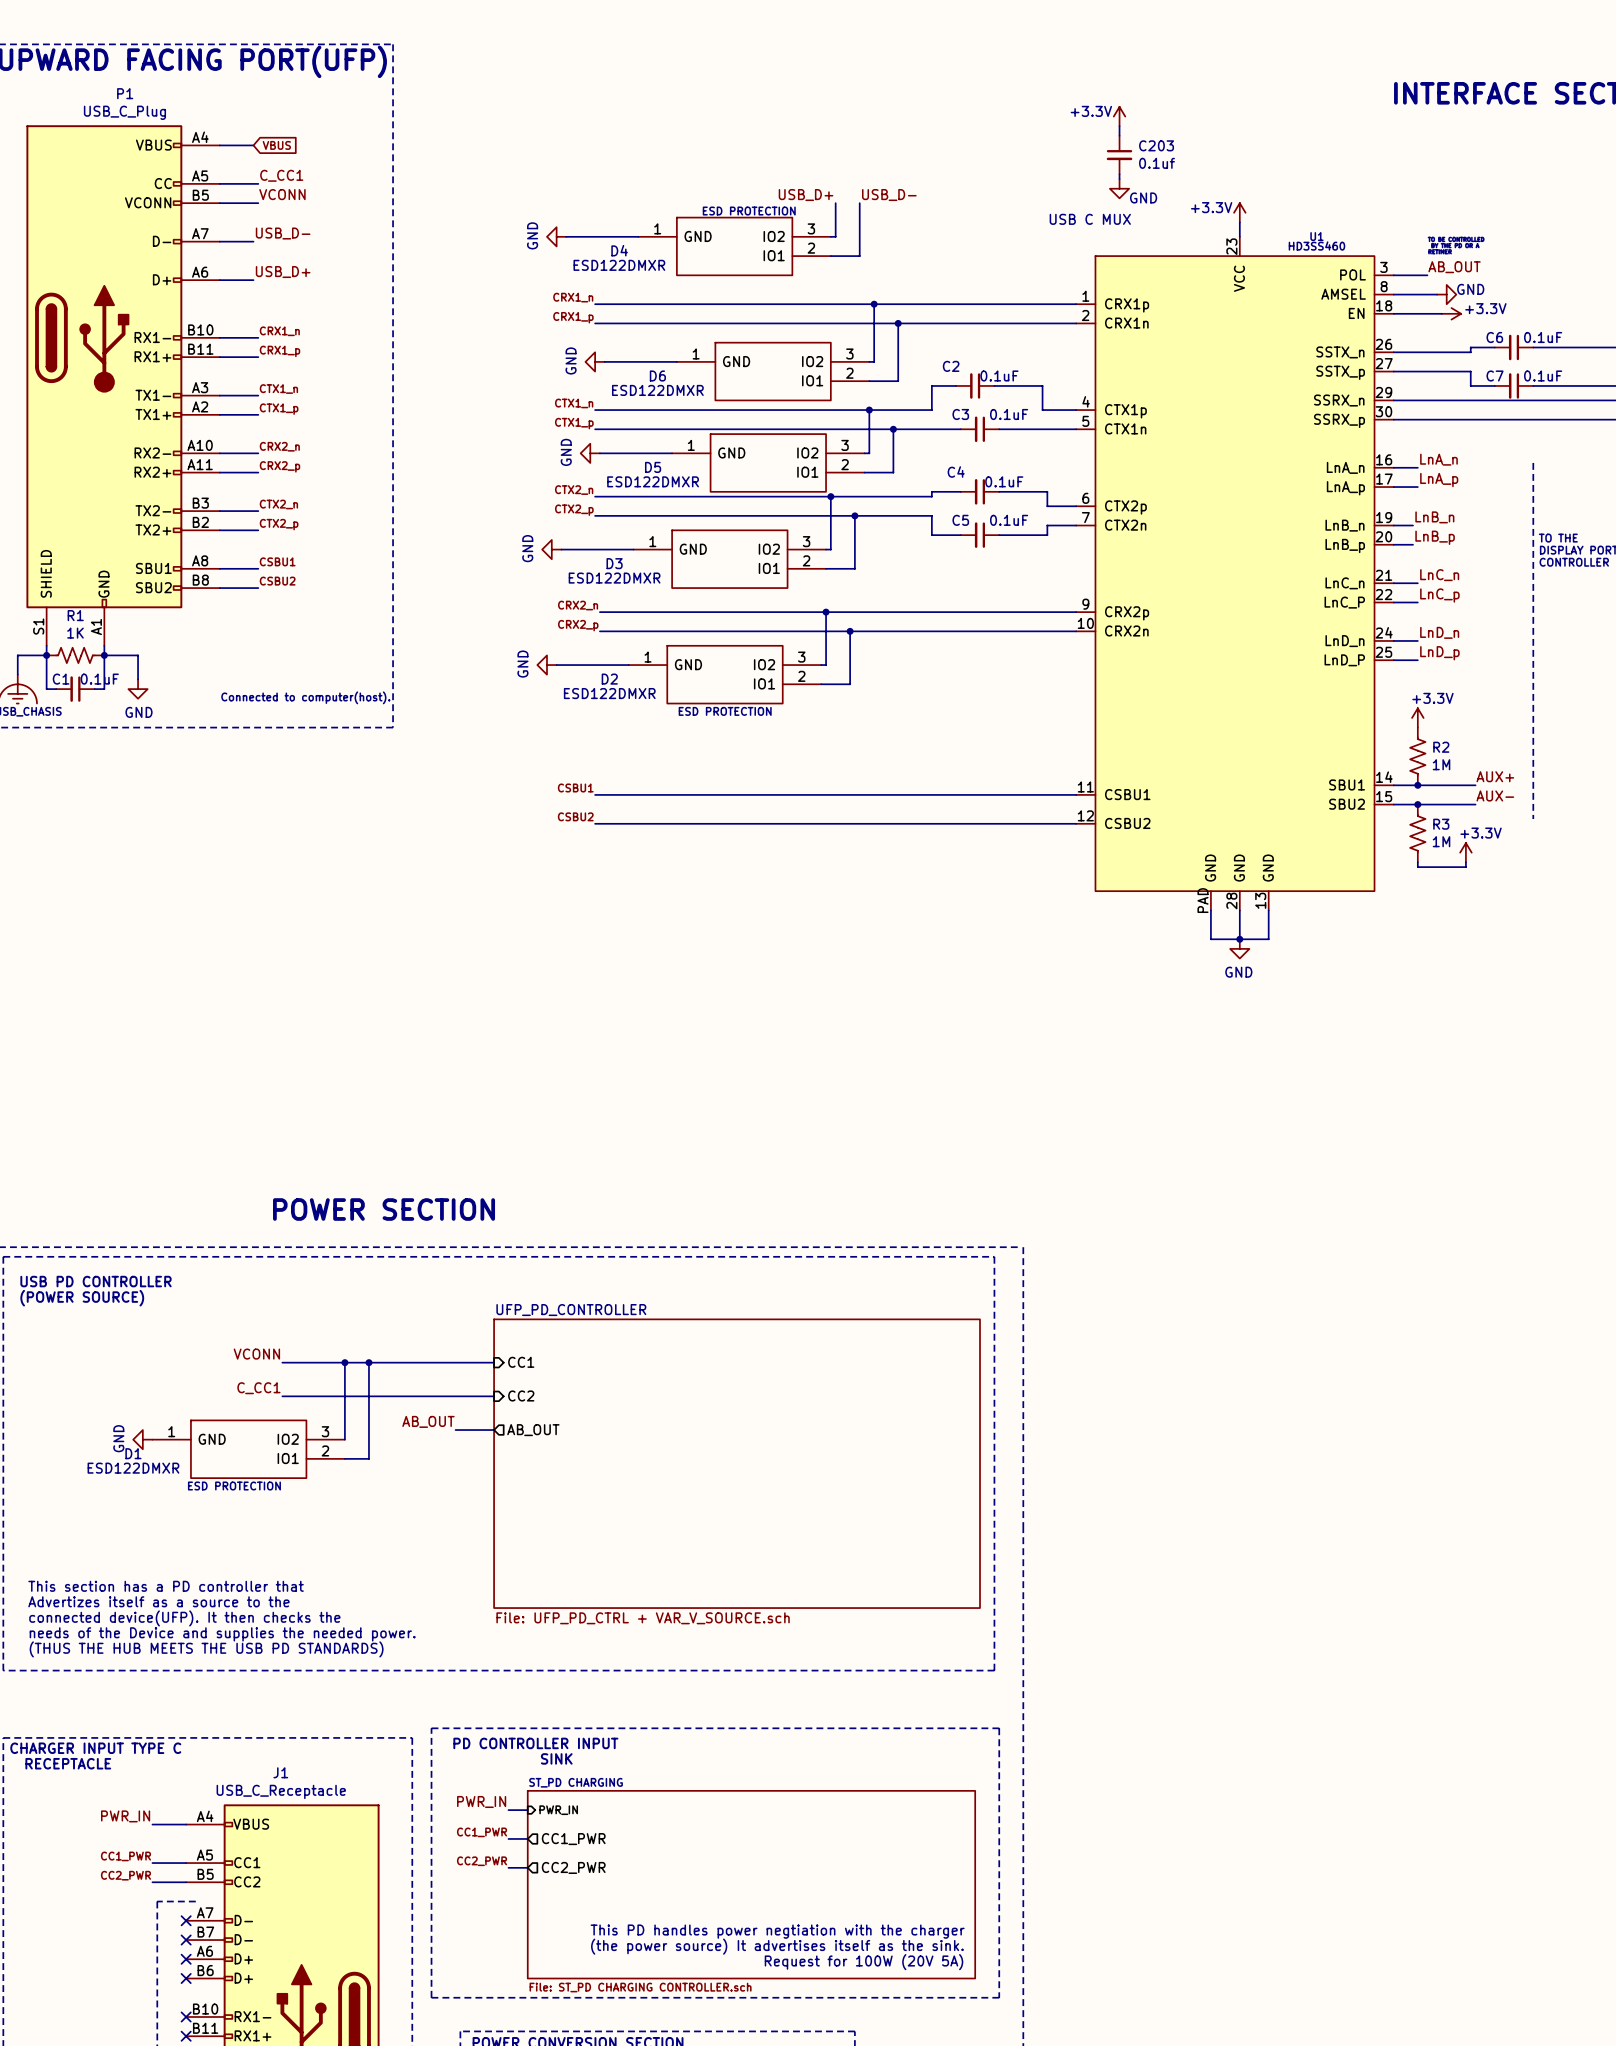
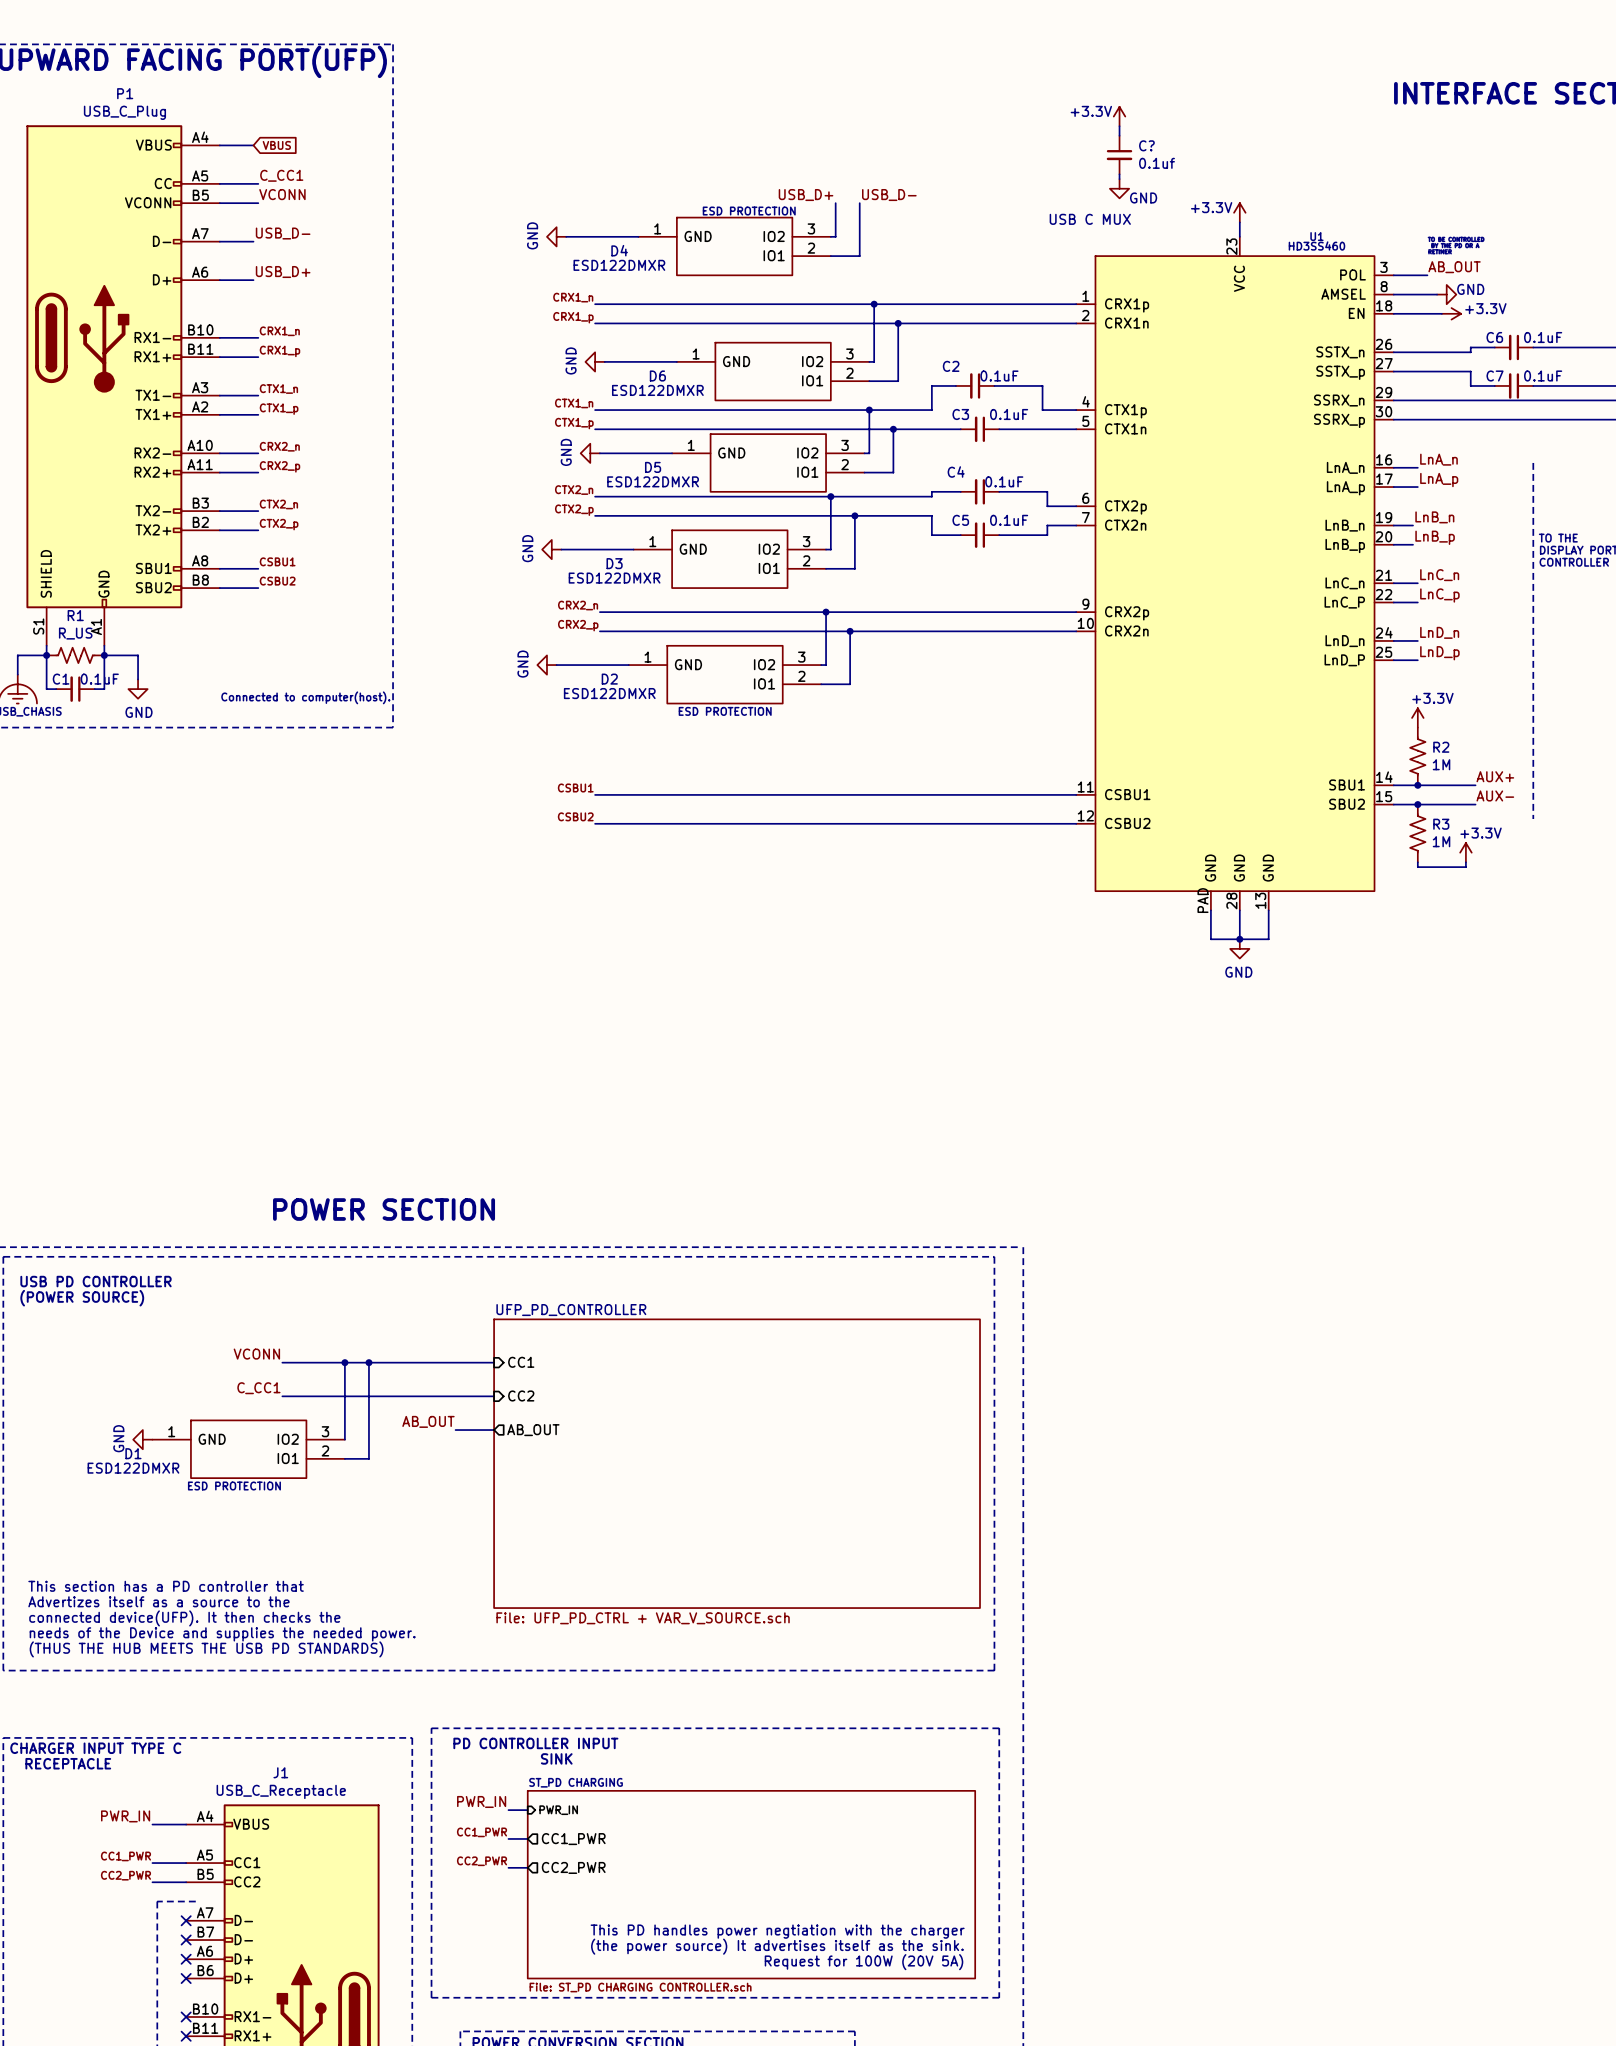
C203 name: C203 (1156, 145) -> C? (1146, 145)
R1 value: 1K (75, 633) -> R_US (75, 633)

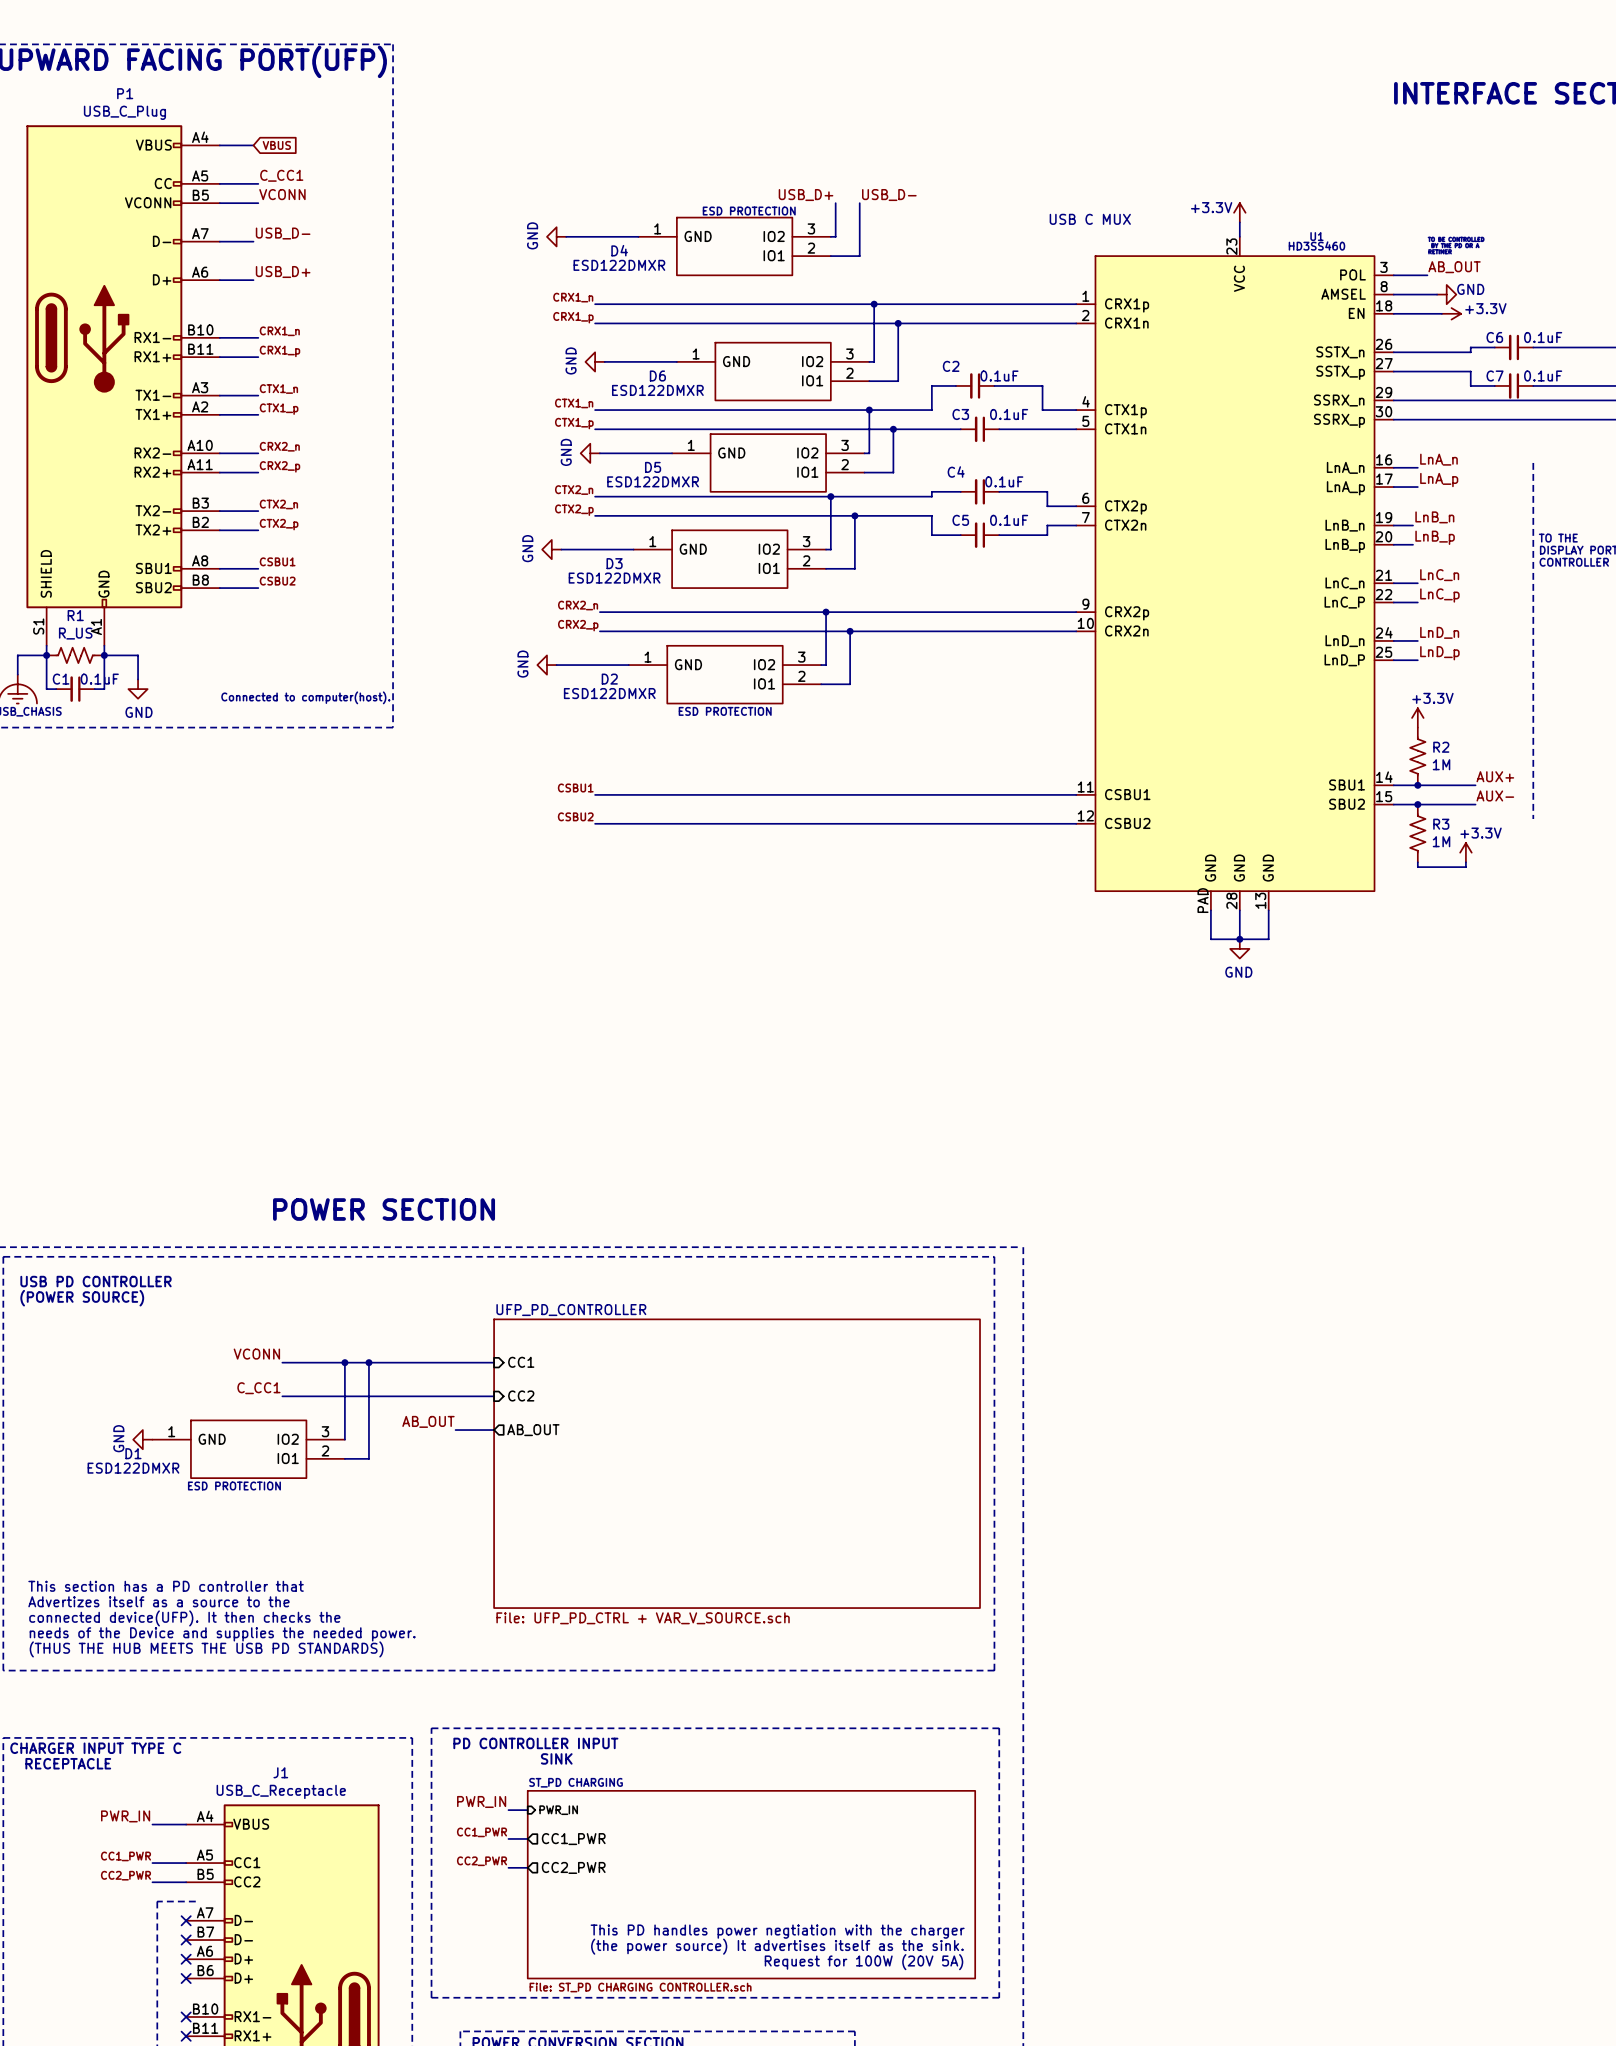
power symbol: +3.3V (1119, 116) -> none
wire: (1119, 126) (1119, 135) -> none
C?: 0.1uf (1119, 155) -> none
wire: (1119, 174) (1119, 179) -> none
power symbol: GND (1119, 188) -> none

